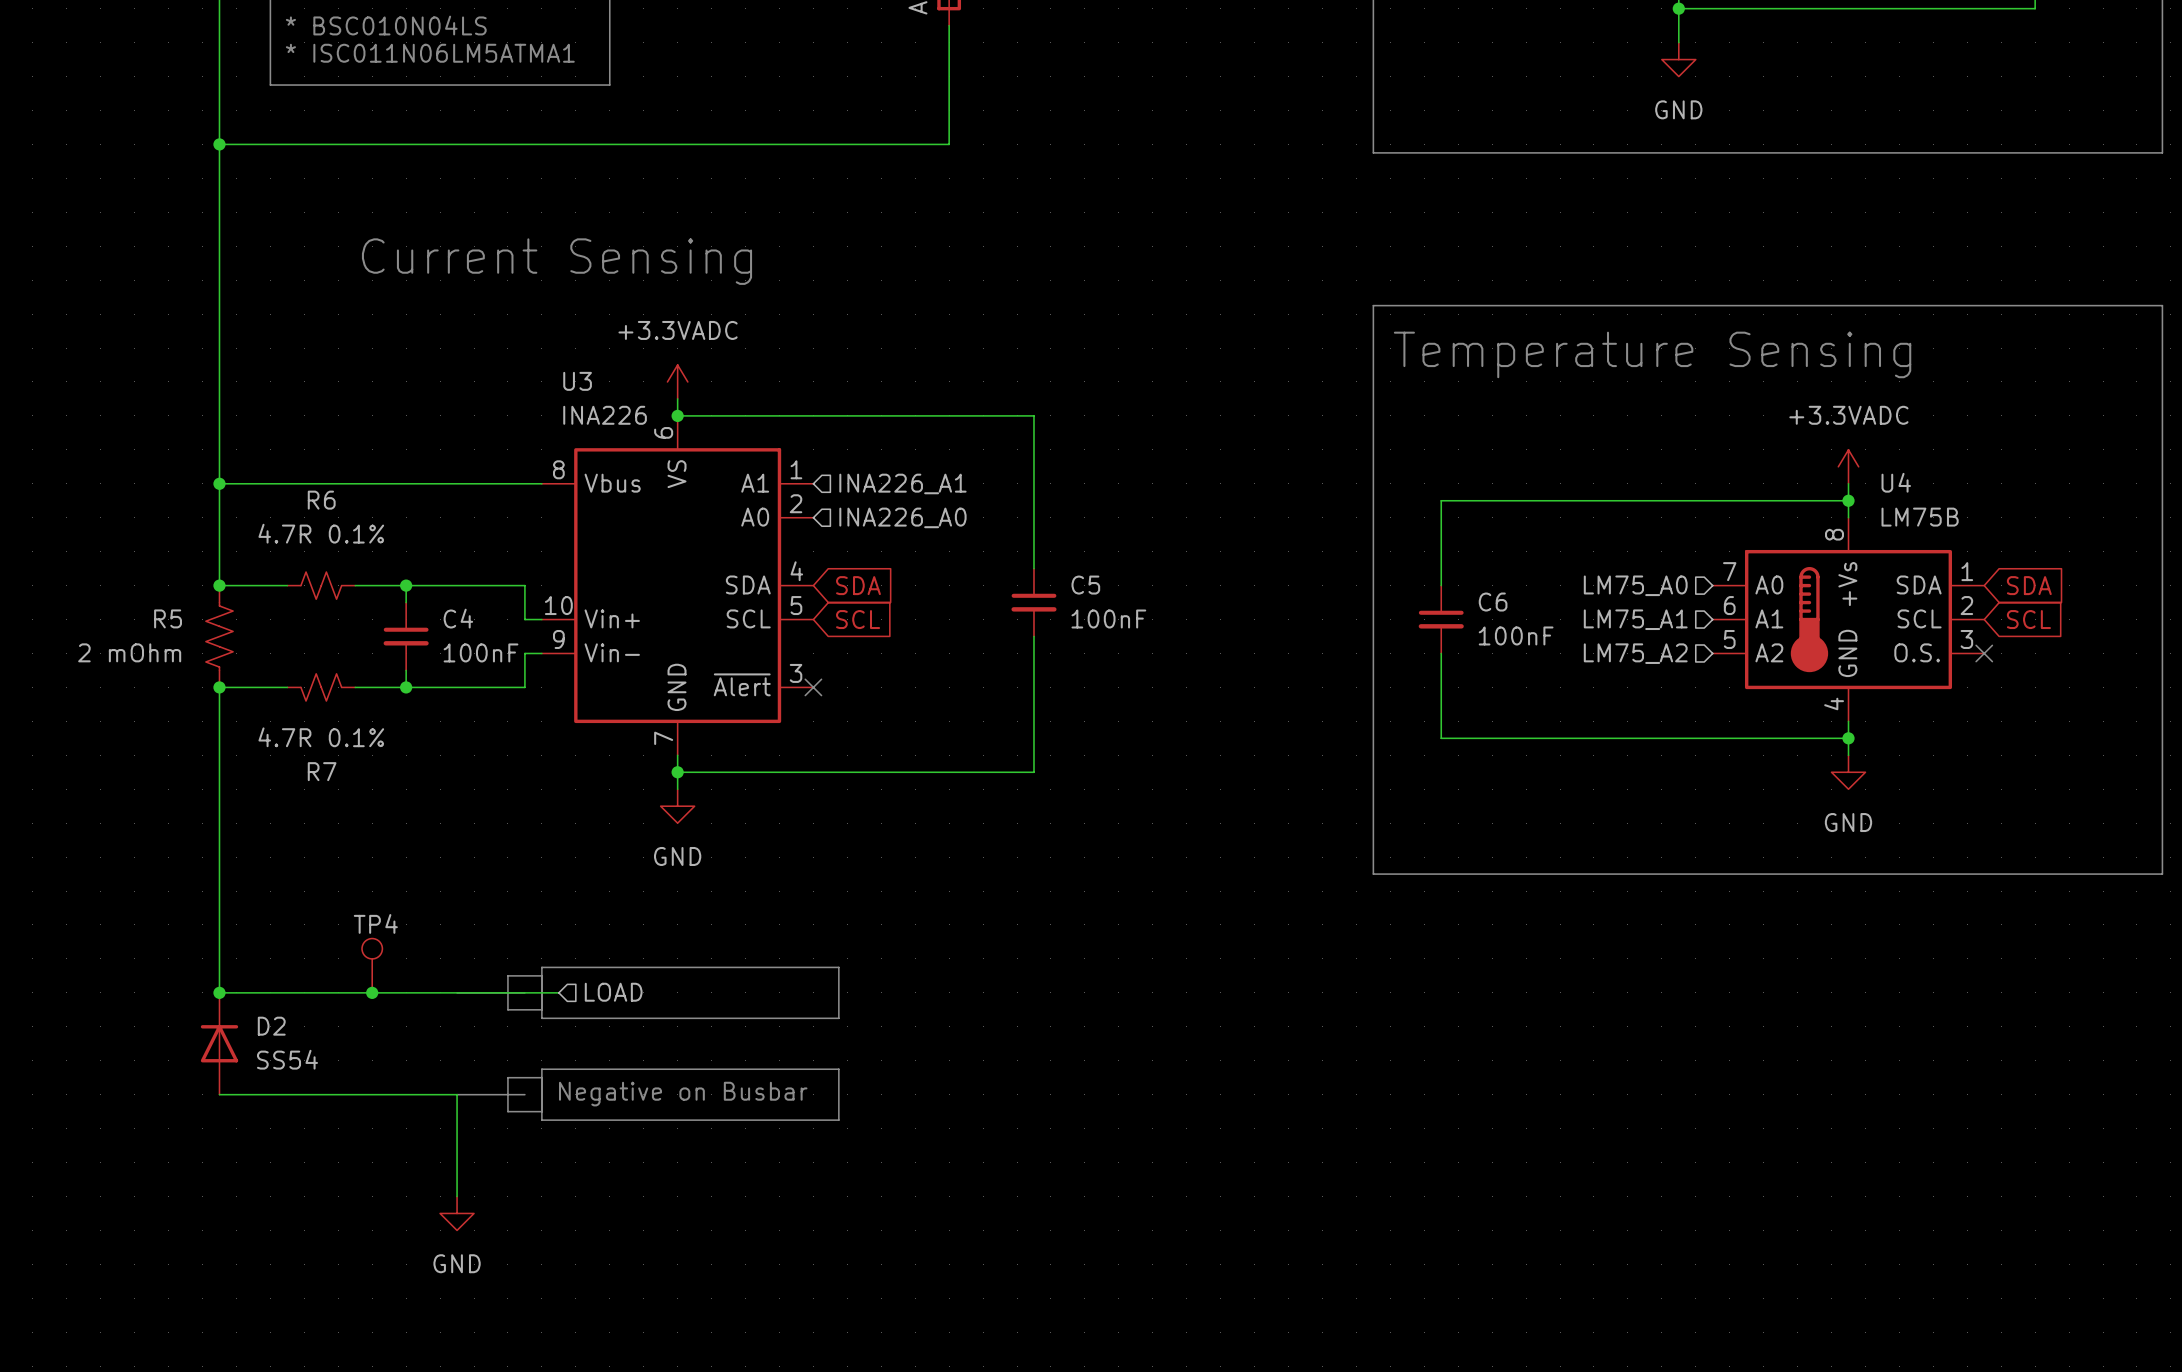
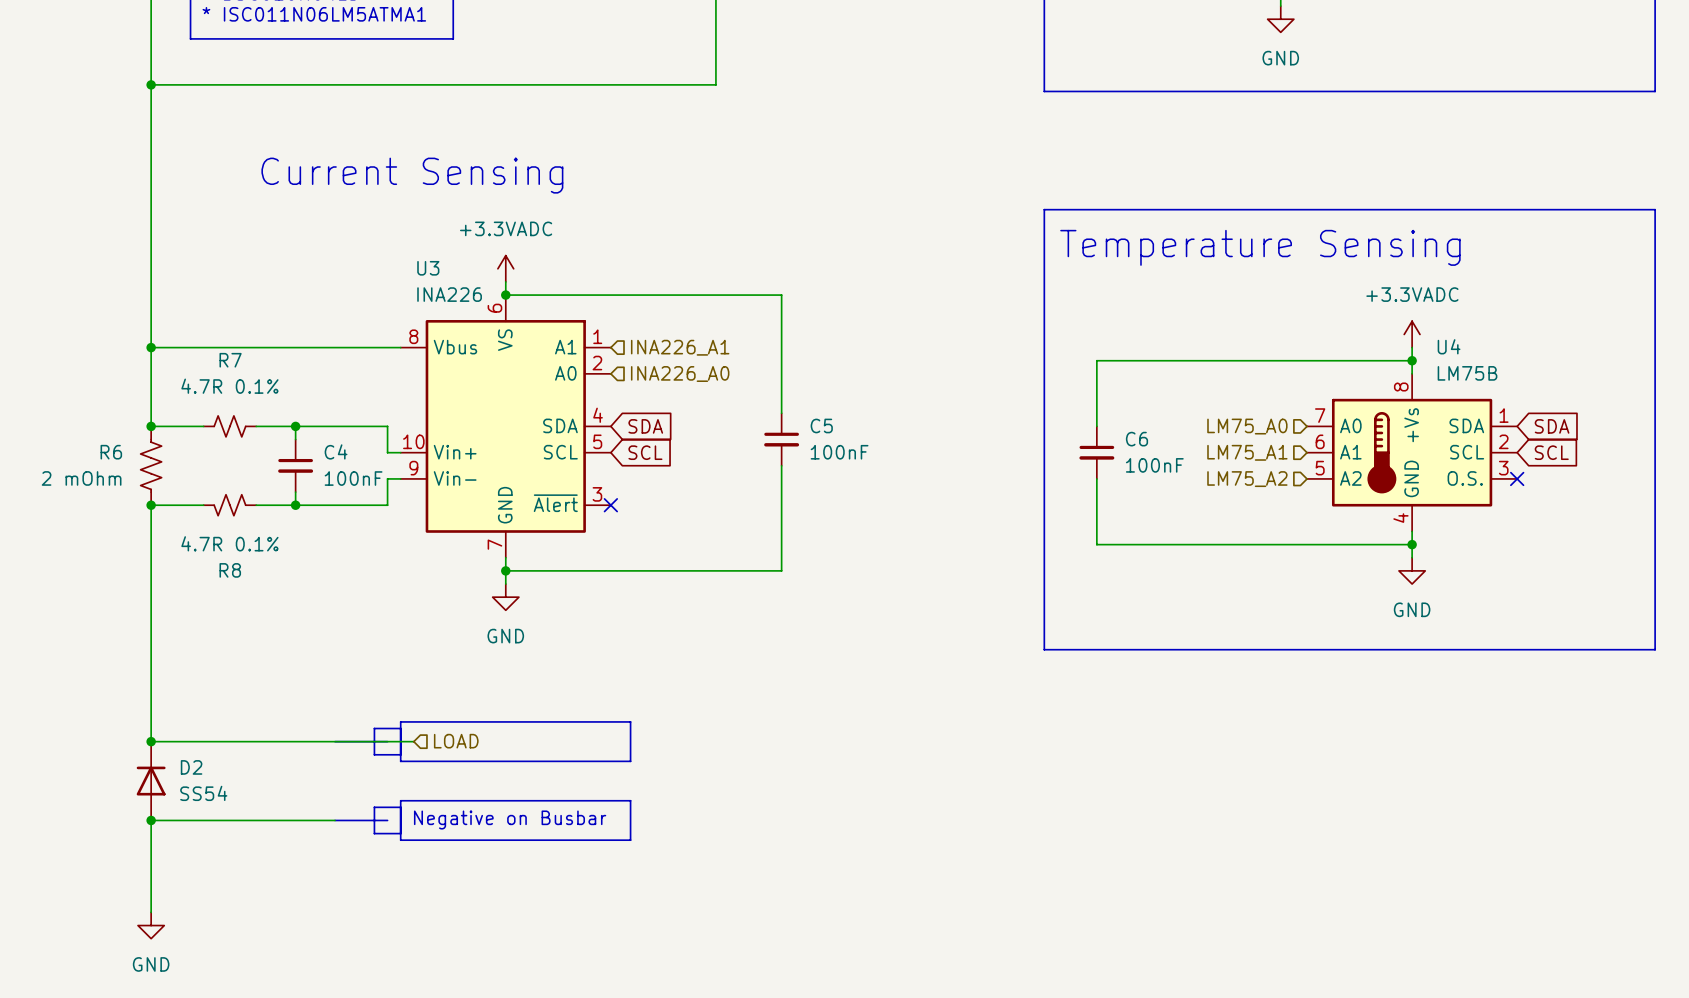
R6 name: R6 (321, 500) -> R7 (230, 360)
R5 name: R5 (168, 618) -> R6 (111, 452)
R7 name: R7 (322, 771) -> R8 (230, 570)
TP4: (372, 965) -> none
junction: (372, 992) -> none
wire: none -> (151, 820) (151, 912)
junction: none -> (151, 820)
wire: (457, 1094) (457, 1196) -> none
power symbol position: GND (457, 1213) -> GND (151, 925)

